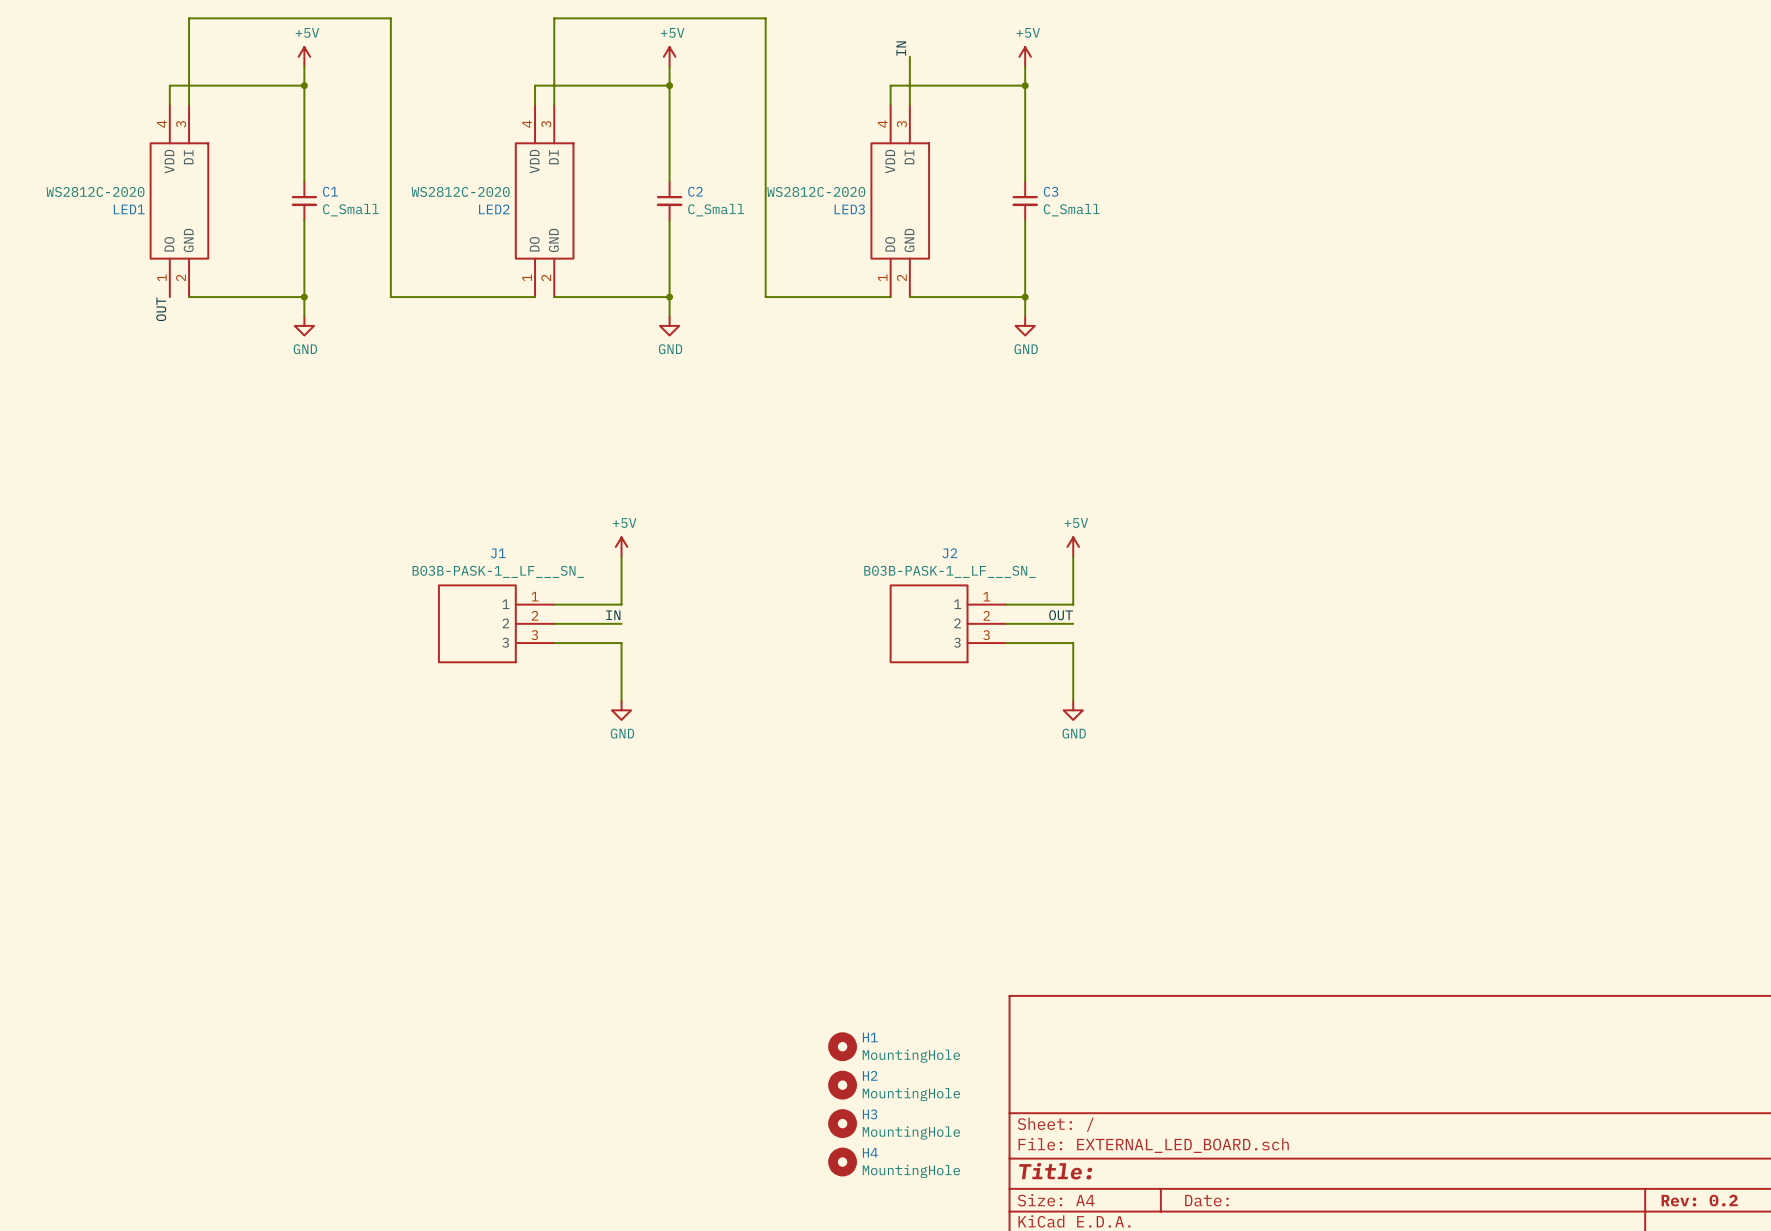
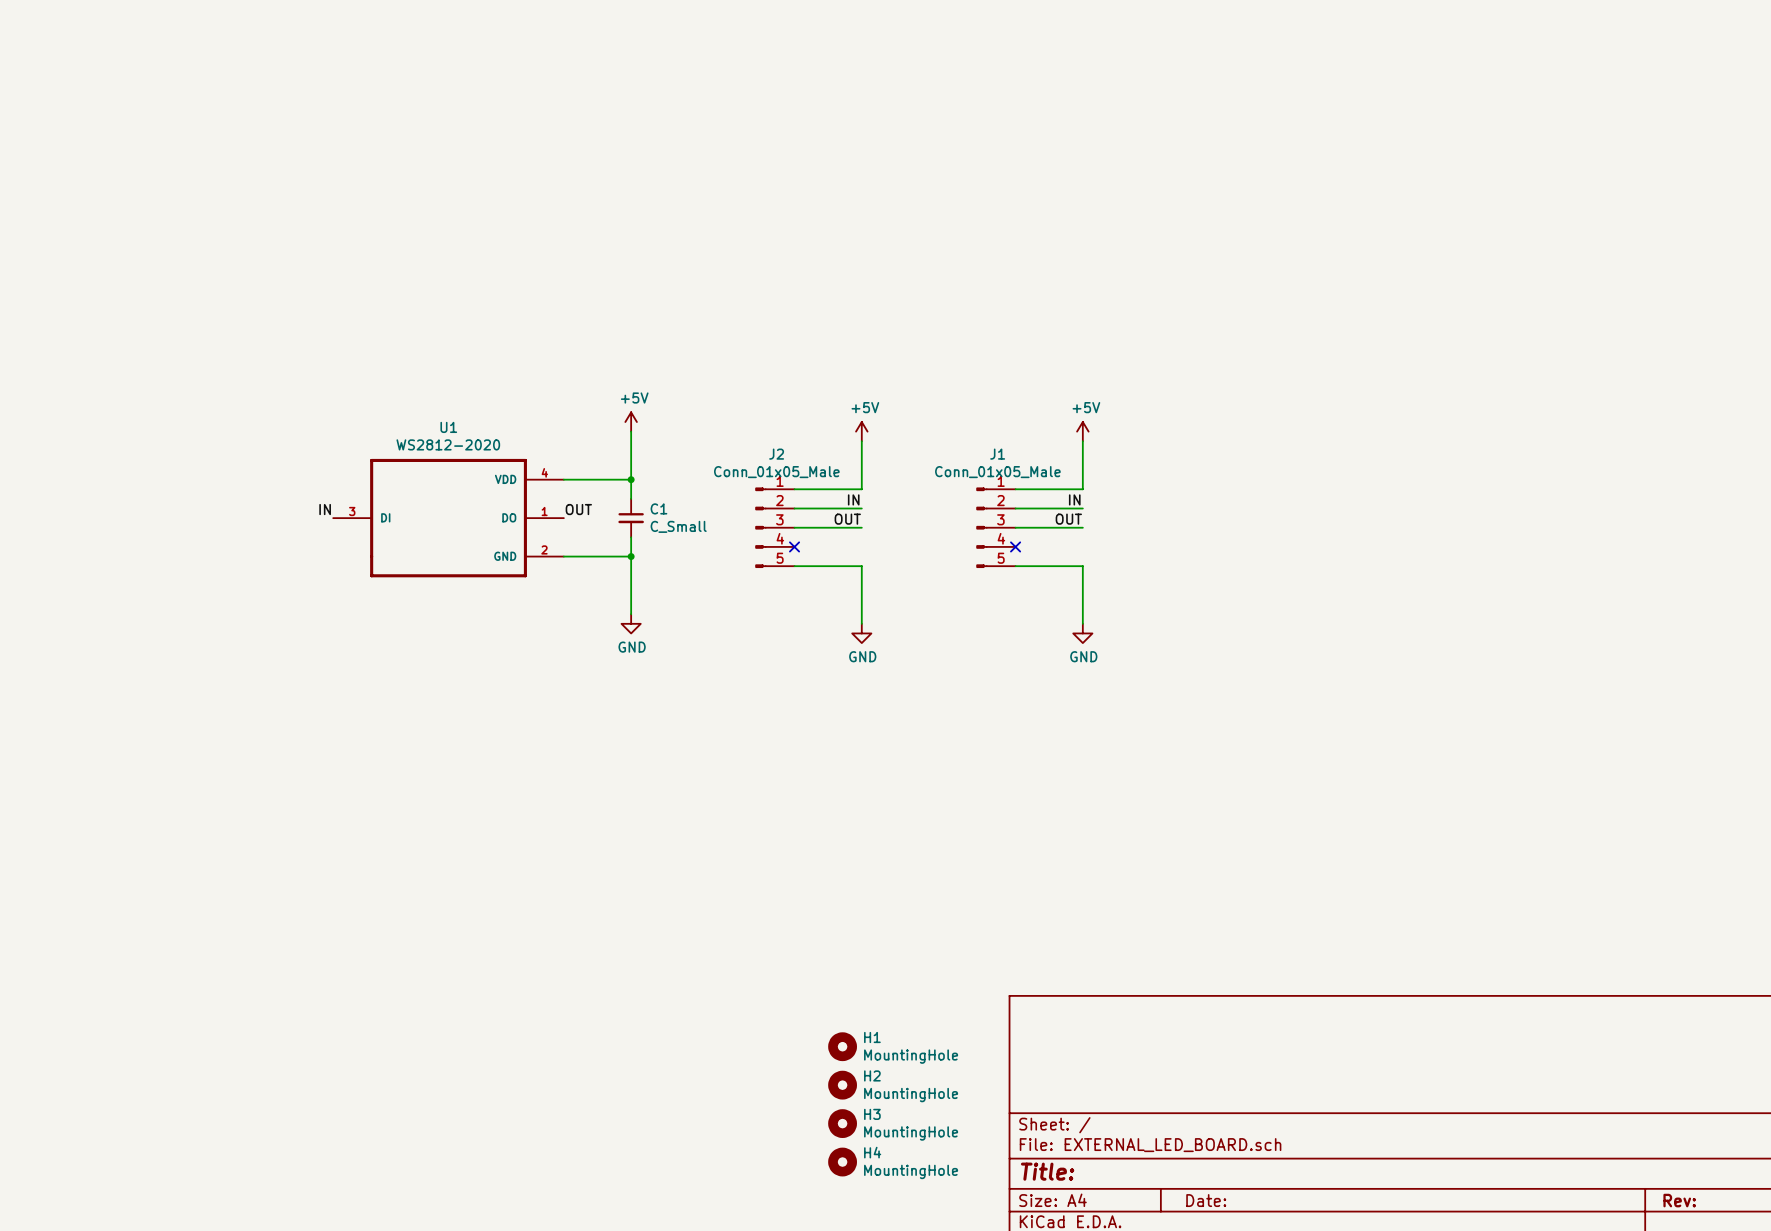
label: IN (901, 48) -> none
power symbol: +5V (304, 56) -> none
power symbol: +5V (669, 56) -> none
wire: (909, 56) (909, 104) -> none
power symbol: +5V (1025, 56) -> none
wire: (304, 66) (304, 181) -> none
wire: (669, 66) (669, 181) -> none
wire: (1025, 66) (1025, 181) -> none
wire: (304, 85) (169, 85) (169, 104) -> none
junction: (304, 85) -> none
wire: (669, 85) (535, 85) (535, 104) -> none
junction: (669, 85) -> none
wire: (1025, 85) (890, 85) (890, 104) -> none
junction: (1025, 85) -> none
wire: (189, 104) (189, 18) (390, 18) (390, 297) (535, 297) -> none
wire: (554, 104) (554, 18) (765, 18) (765, 297) (890, 297) -> none
LED1: WS2812C-2020 (179, 200) -> none
C1 position: (304, 200) -> (631, 518)
LED2: WS2812C-2020 (544, 200) -> none
C2: C_Small (669, 200) -> none
LED3: WS2812C-2020 (900, 200) -> none
C3: C_Small (1025, 200) -> none
wire: (304, 220) (304, 316) -> none
wire: (669, 220) (669, 316) -> none
wire: (1025, 220) (1025, 316) -> none
wire: (189, 297) (304, 297) -> none
junction: (304, 297) -> none
wire: (554, 297) (669, 297) -> none
junction: (669, 297) -> none
wire: (909, 297) (1025, 297) -> none
junction: (1025, 297) -> none
label: OUT (161, 309) -> none
power symbol: GND (304, 325) -> none
power symbol: GND (669, 325) -> none
power symbol: GND (1025, 325) -> none
wire: none -> (631, 431) (631, 498)
power symbol: none -> +5V (861, 431)
wire: none -> (861, 441) (861, 489) (794, 489)
wire: none -> (563, 479) (631, 479)
junction: none -> (631, 479)
label: none -> IN (853, 499)
label: none -> IN (1074, 499)
wire: none -> (794, 508) (861, 508)
label: none -> IN (325, 509)
label: none -> OUT (578, 509)
U1: none -> WS2812-2020 (448, 518)
label: none -> OUT (847, 519)
wire: none -> (794, 527) (861, 527)
wire: none -> (1015, 527) (1082, 527)
wire: none -> (631, 537) (631, 614)
power symbol position: +5V (621, 546) -> +5V (631, 422)
no-connect mark: none -> (794, 546)
no-connect mark: none -> (1015, 546)
power symbol position: +5V (1073, 546) -> +5V (1082, 431)
wire: (621, 556) (621, 604) (554, 604) -> none
junction: none -> (631, 556)
wire: (1073, 556) (1073, 604) (1005, 604) -> (1082, 441) (1082, 489) (1015, 489)
wire: none -> (794, 566) (861, 566) (861, 623)
J1 value: B03B-PASK-1__LF___SN_ (498, 571) -> Conn_01x05_Male (997, 472)
J2 value: B03B-PASK-1__LF___SN_ (950, 571) -> Conn_01x05_Male (776, 472)
J1 symbol: [438, 584, 555, 663] -> [976, 487, 1016, 568]
J2 symbol: [890, 584, 1006, 663] -> [755, 487, 795, 568]
label: IN (613, 615) -> none
label position: OUT (1061, 615) -> OUT (1068, 519)
wire: (554, 623) (621, 623) -> (563, 556) (631, 556)
wire: (1005, 623) (1073, 623) -> (1015, 508) (1082, 508)
power symbol: none -> GND (861, 633)
wire: (554, 643) (621, 643) (621, 700) -> none
wire: (1005, 643) (1073, 643) (1073, 700) -> (1015, 566) (1082, 566) (1082, 623)
power symbol position: GND (621, 710) -> GND (631, 623)
power symbol position: GND (1073, 710) -> GND (1082, 633)
title block: Rev: 0.2 (1699, 1200) -> Rev: (1679, 1200)

